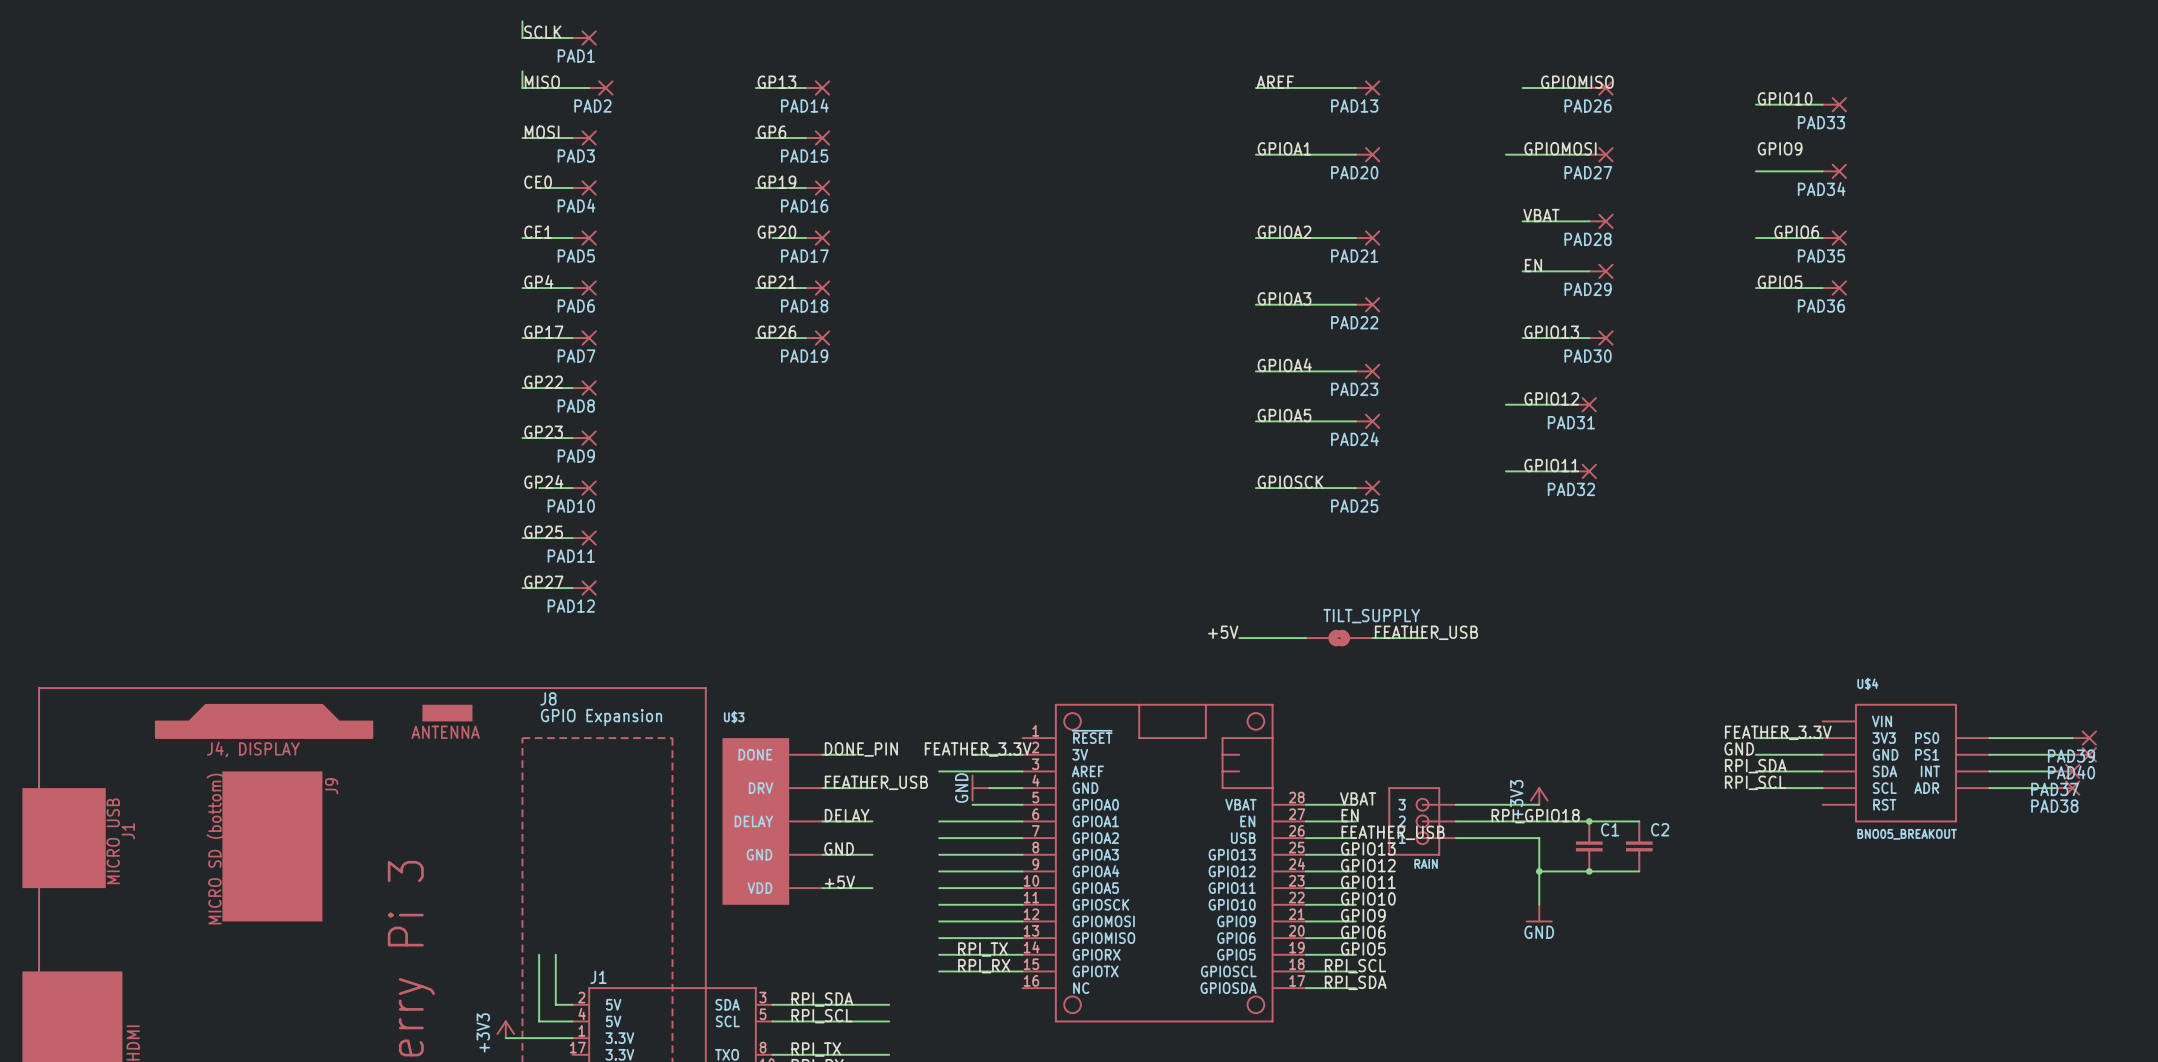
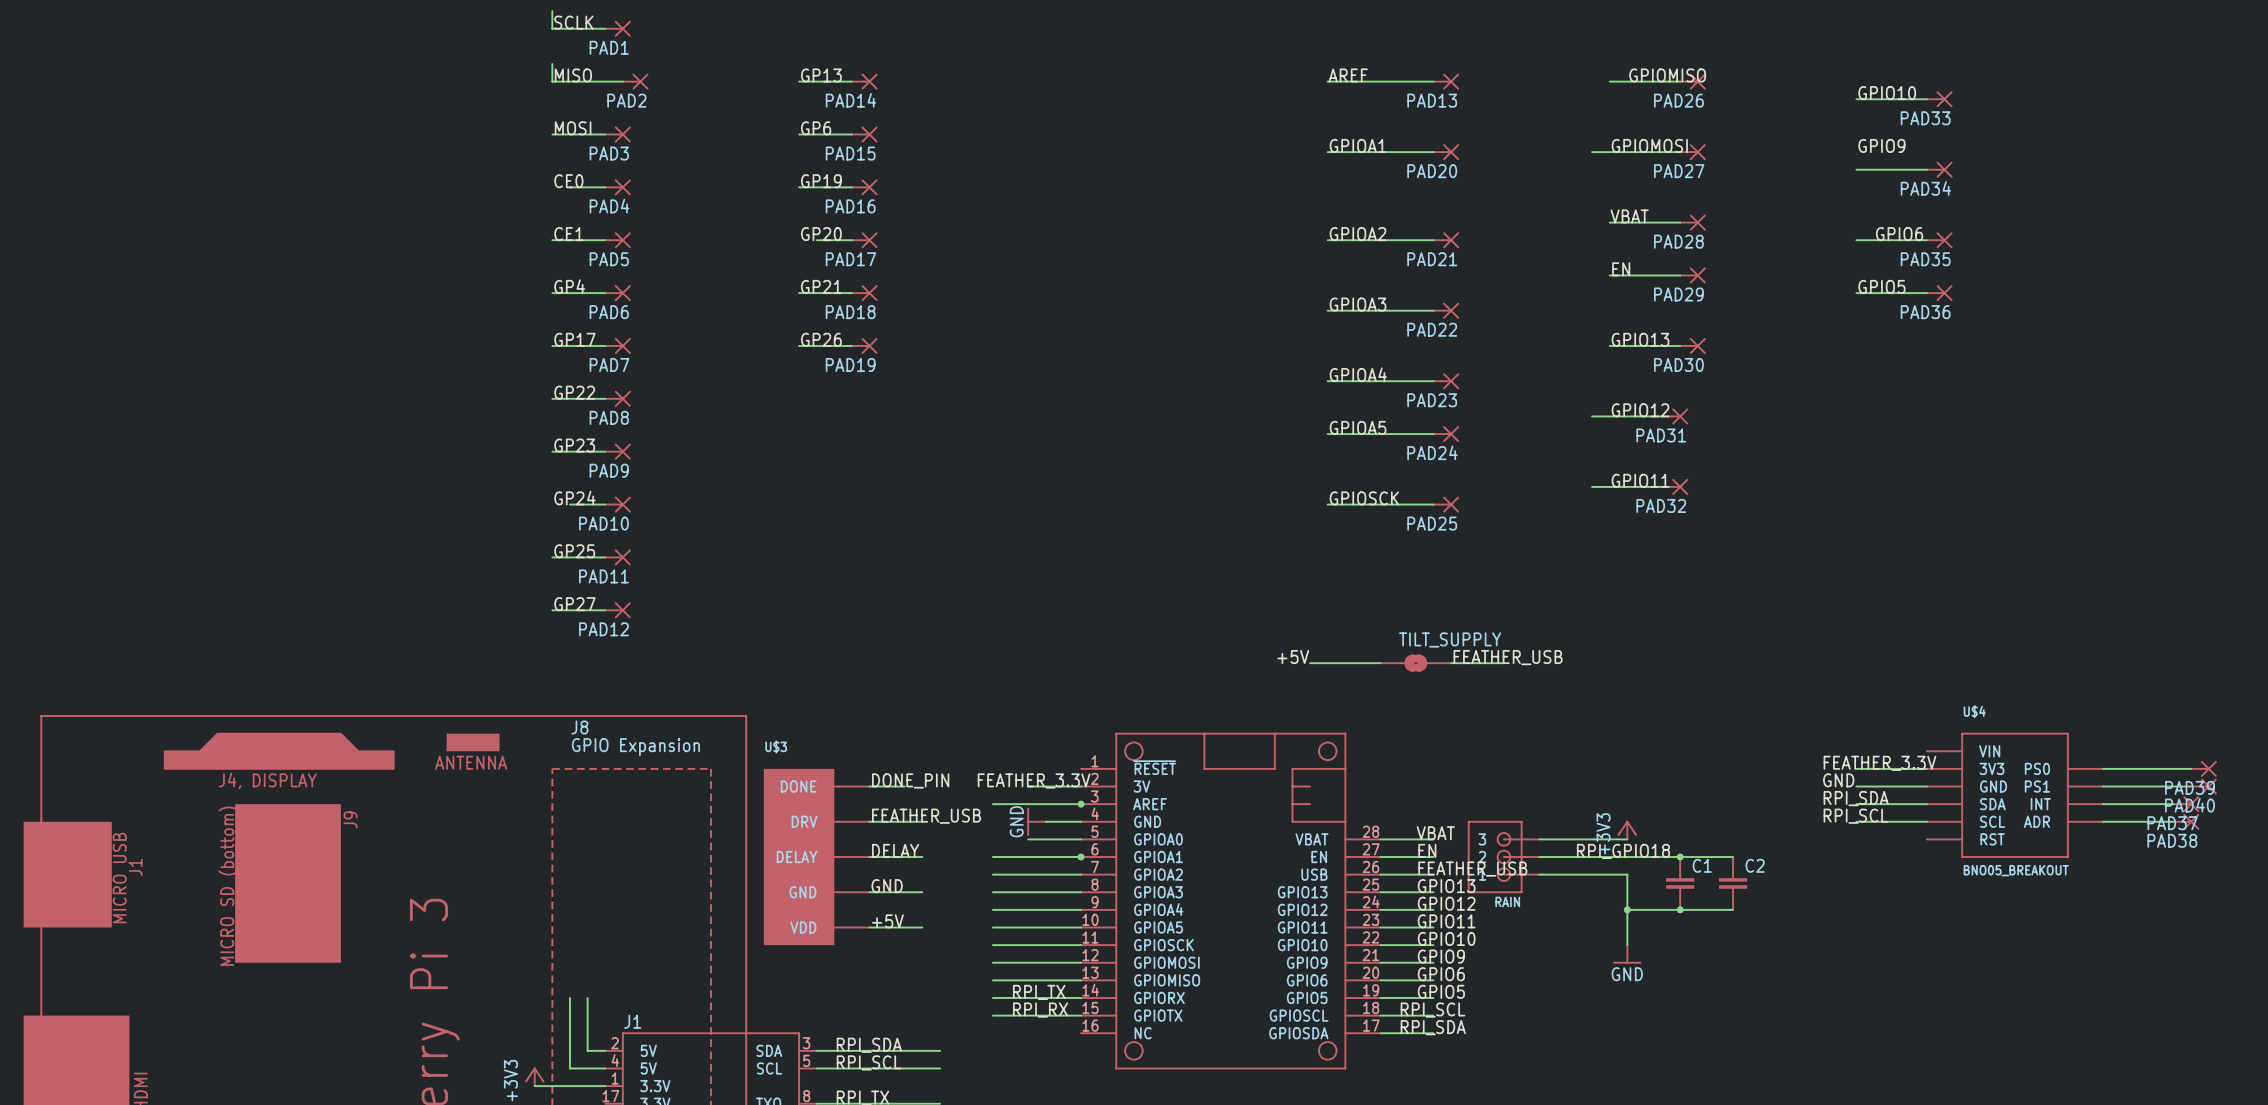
junction: none -> (1081, 804)
junction: none -> (1081, 857)

